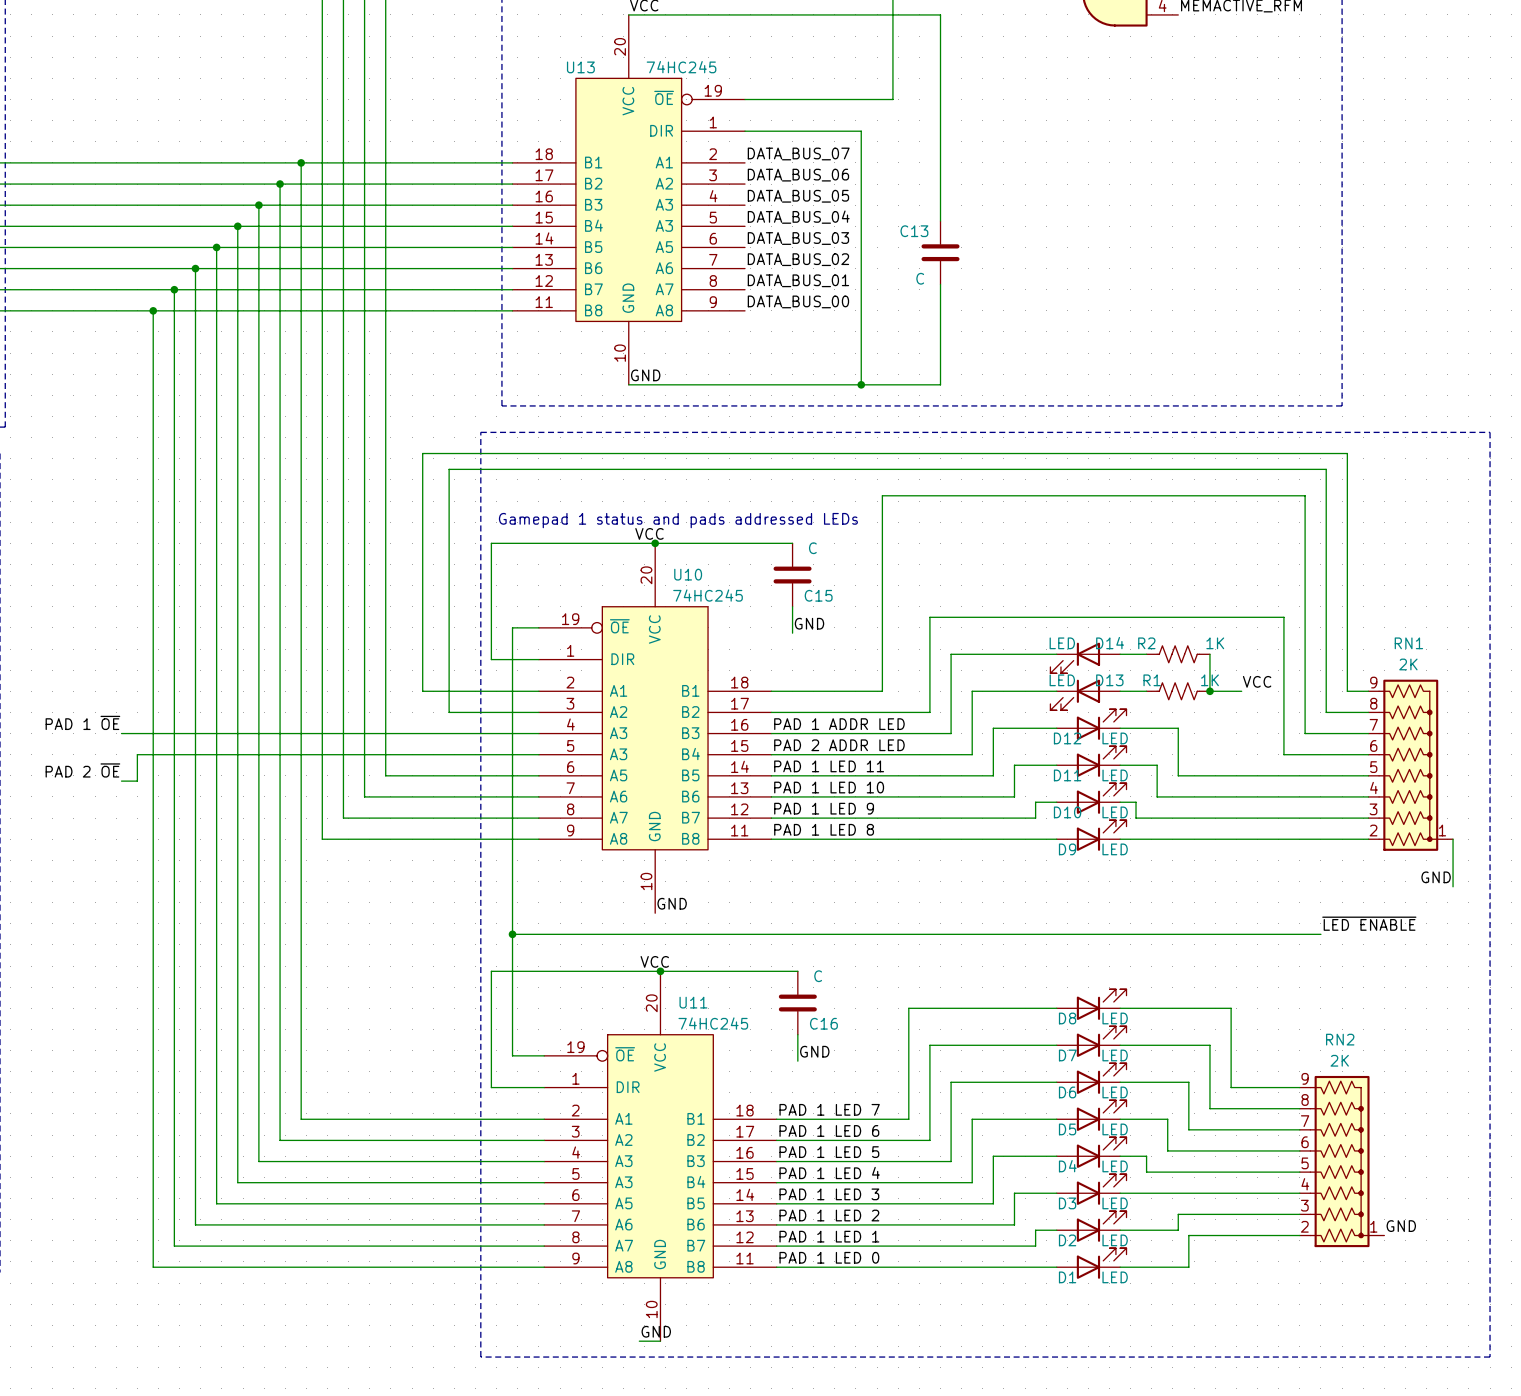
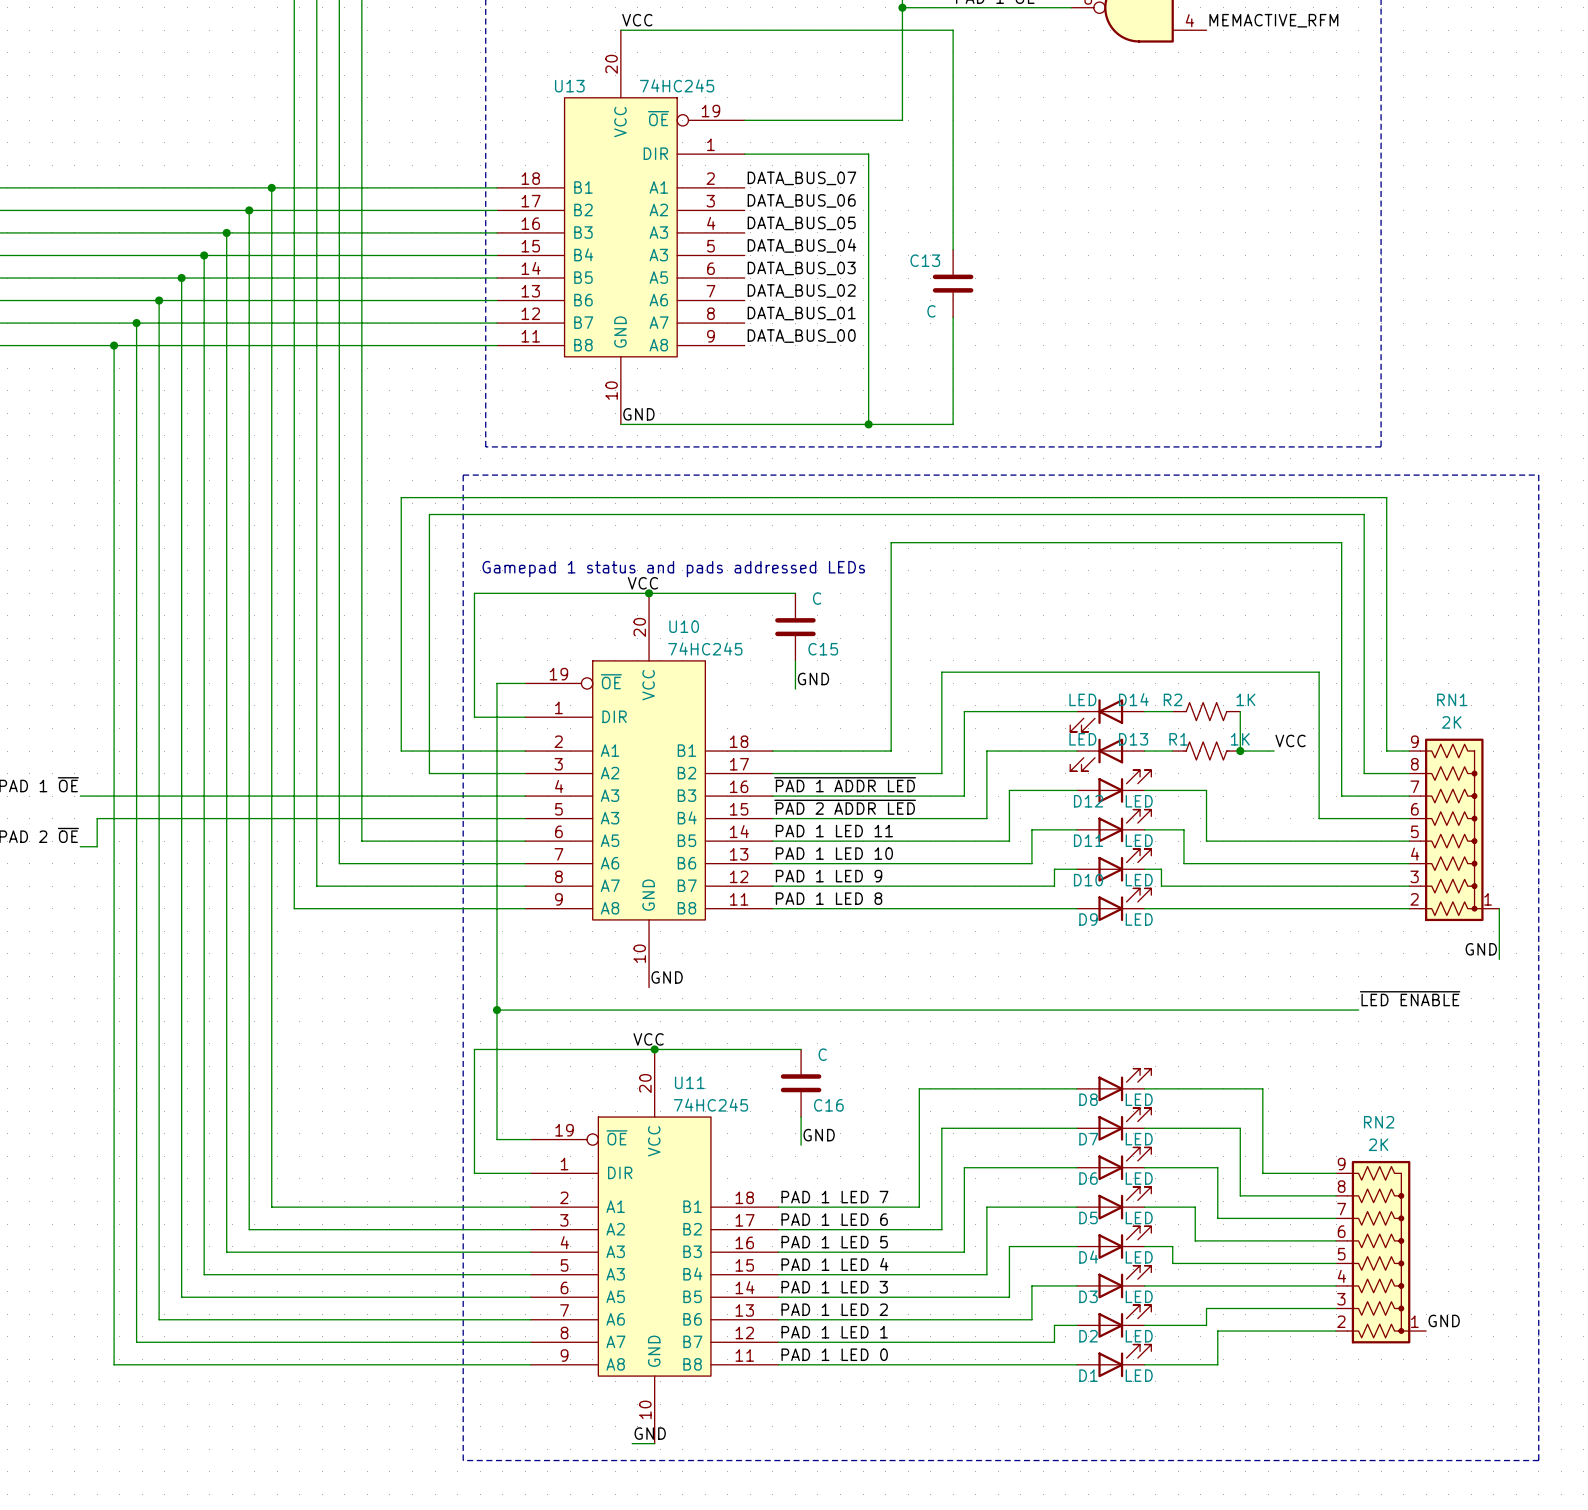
label: PAD 1 ADDR LED (839, 724) -> ~{PAD 1 ADDR LED} (845, 784)
label: PAD 2 ADDR LED (839, 745) -> ~{PAD 2 ADDR LED} (845, 807)

